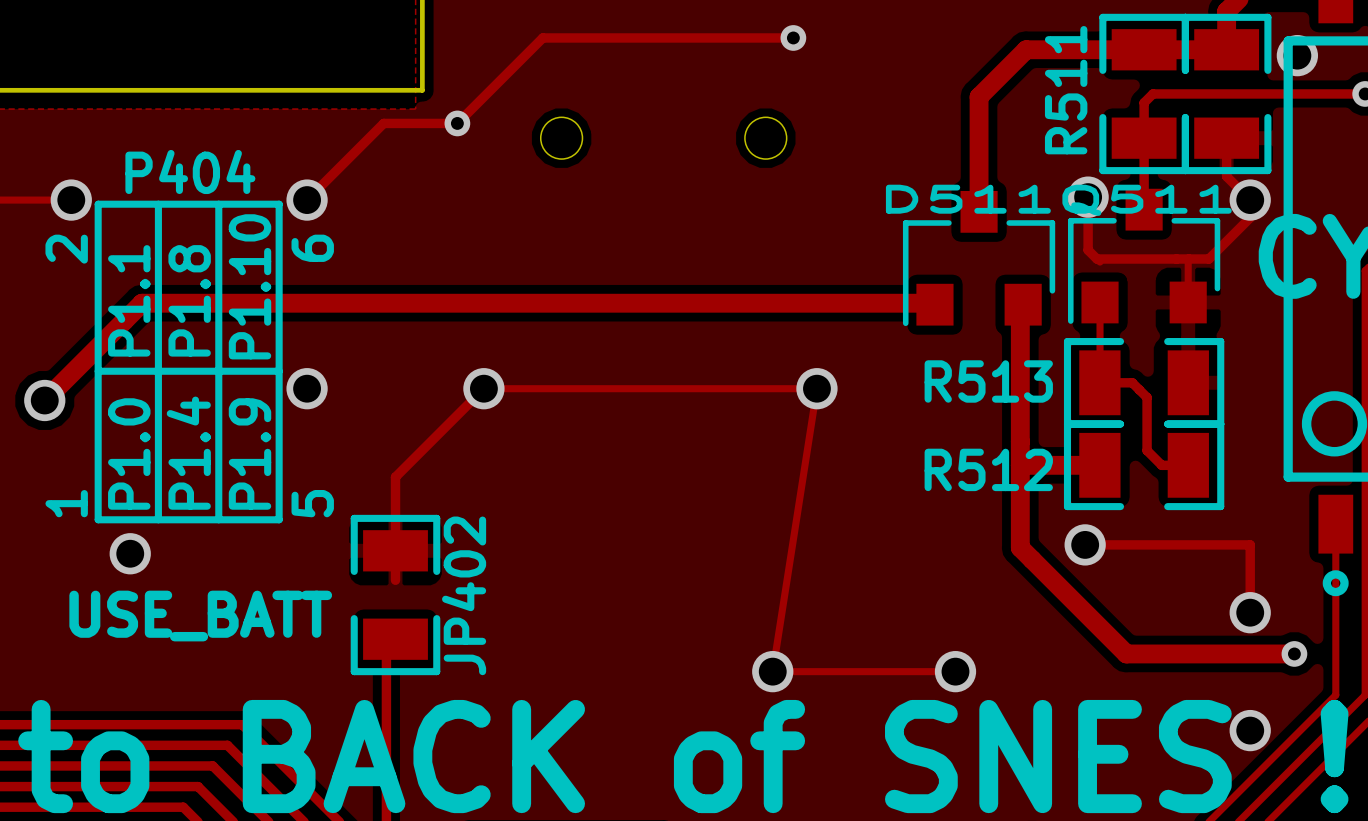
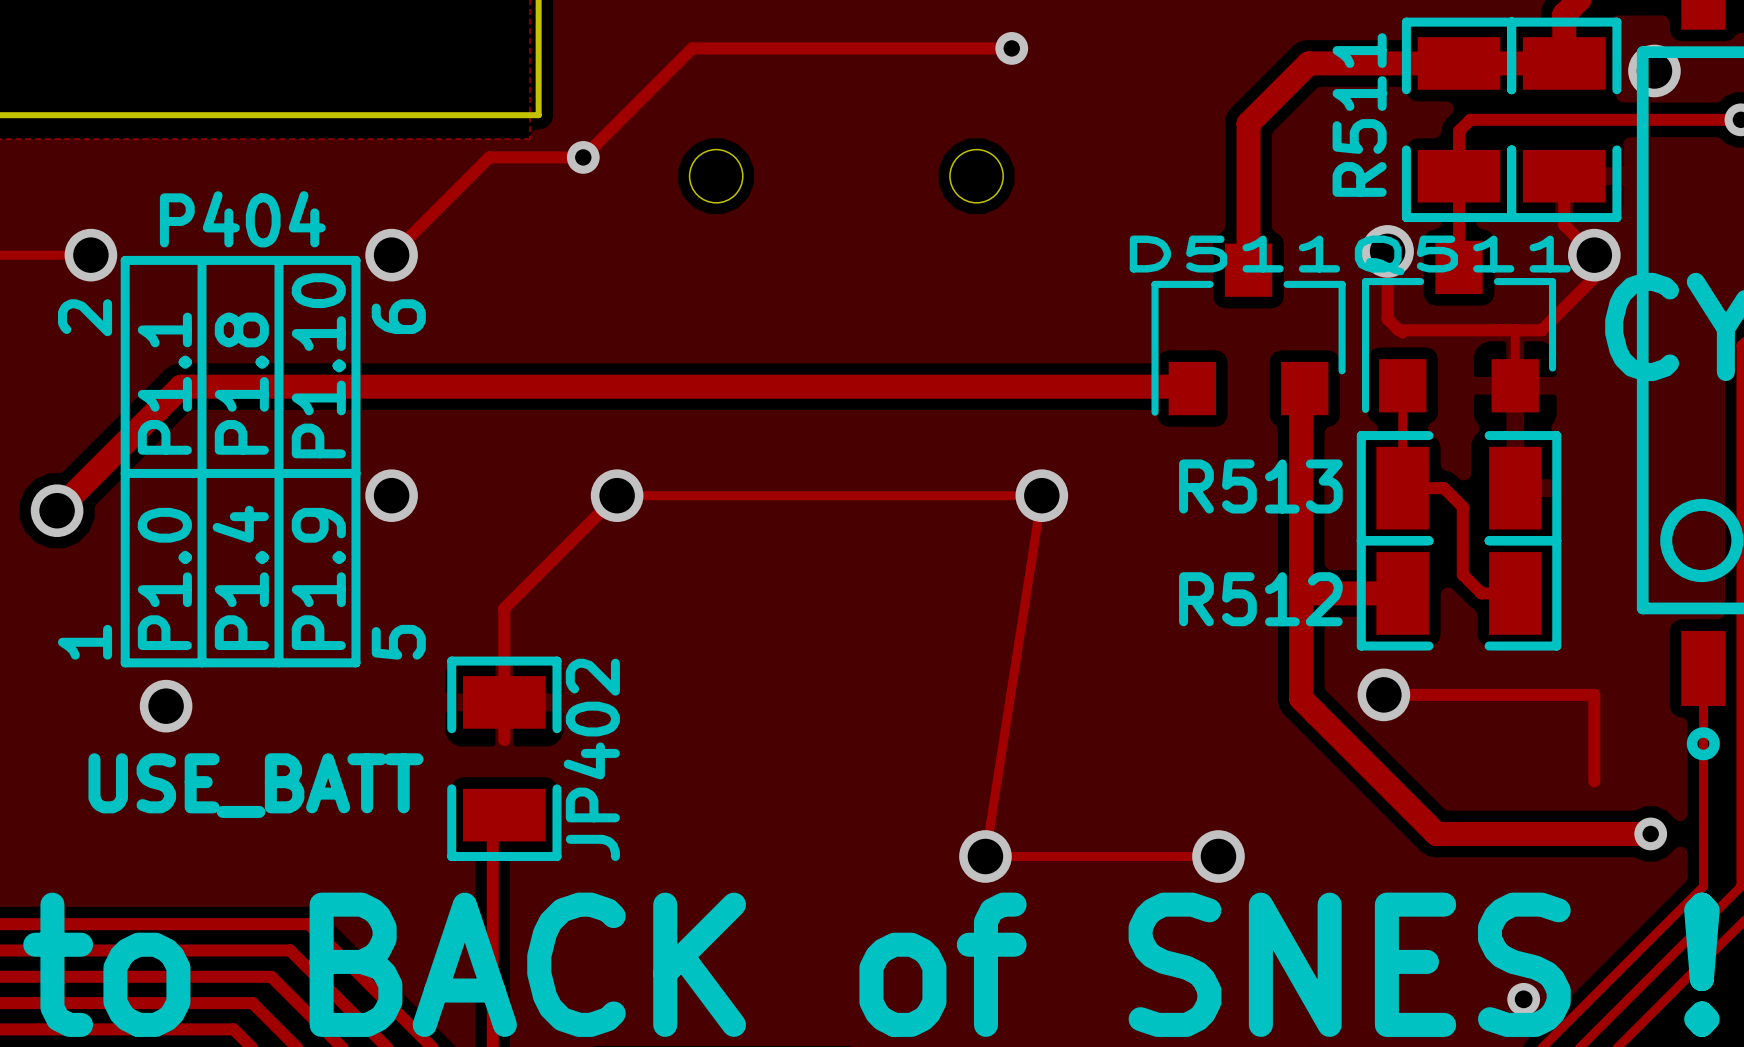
via: (1250, 612) -> none
via: (1250, 730) -> none
via: none -> (1523, 999)

